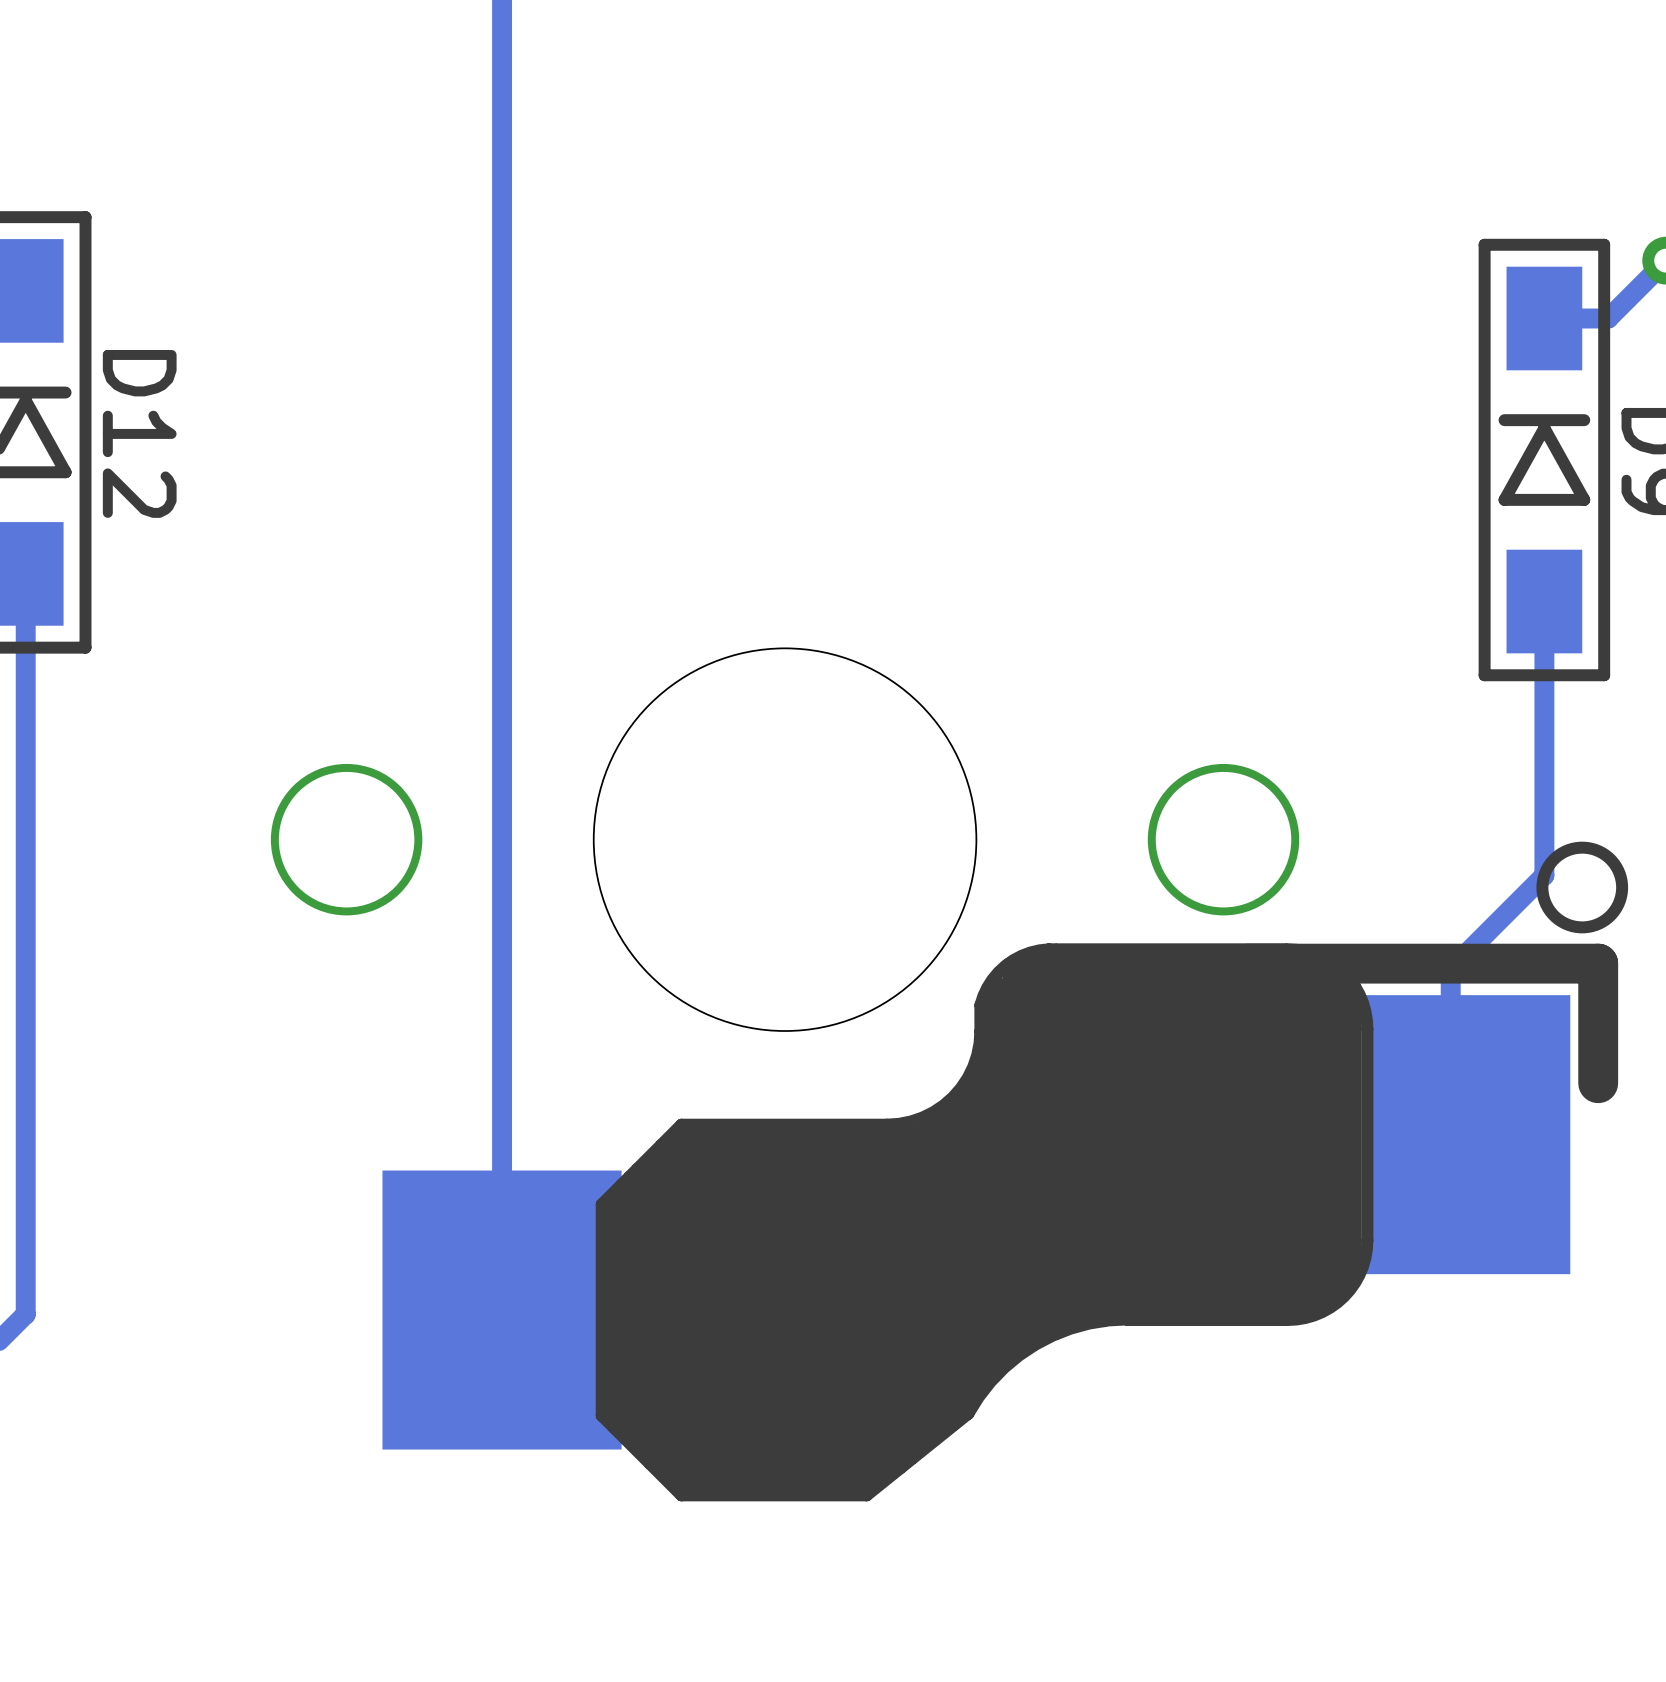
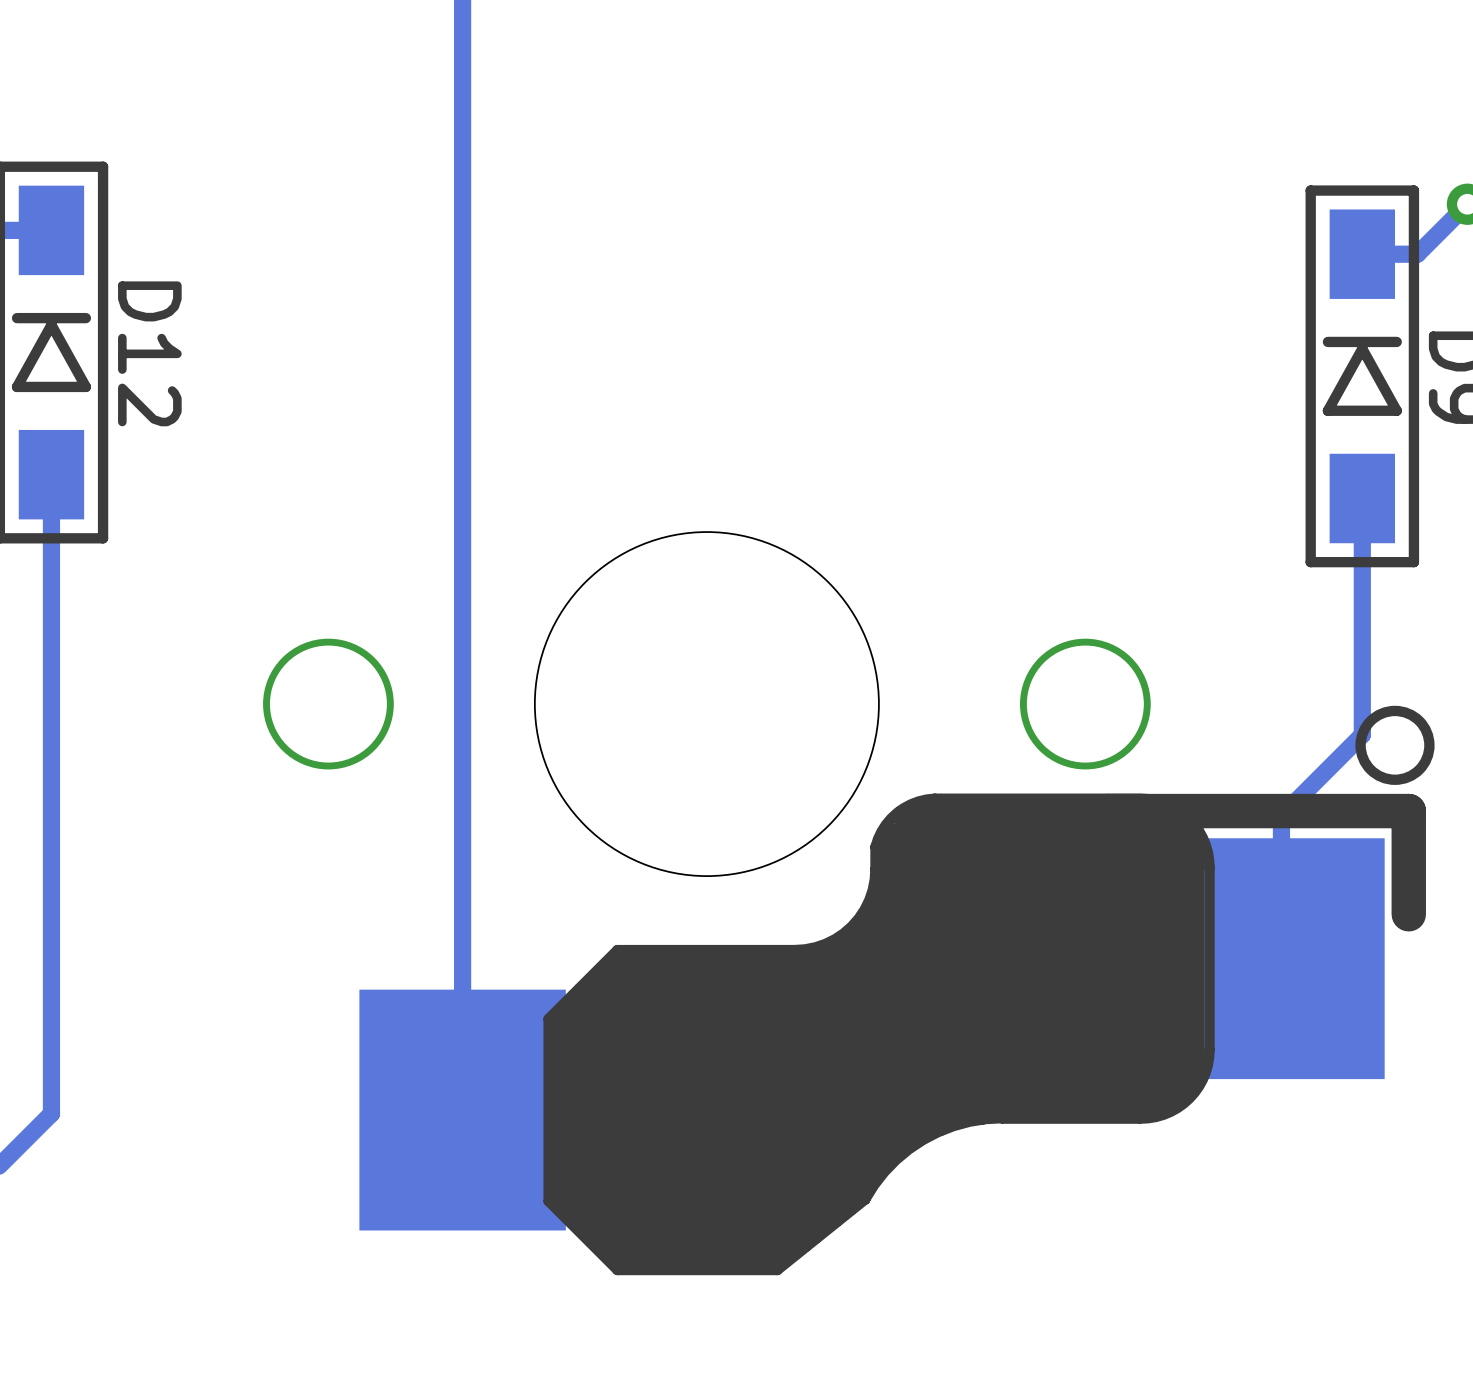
part footprint: [270, 648, 1629, 1502] -> [263, 532, 1435, 1276]

